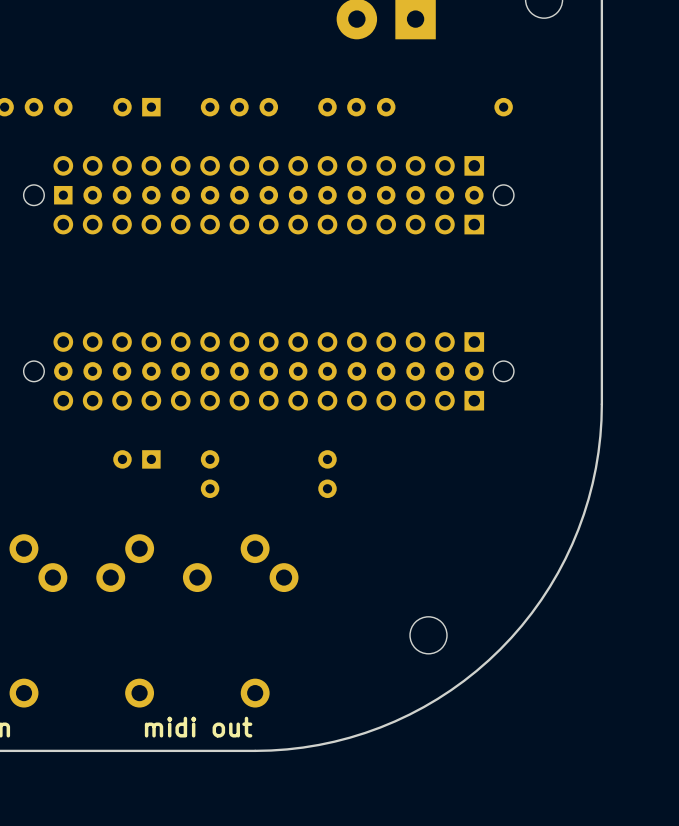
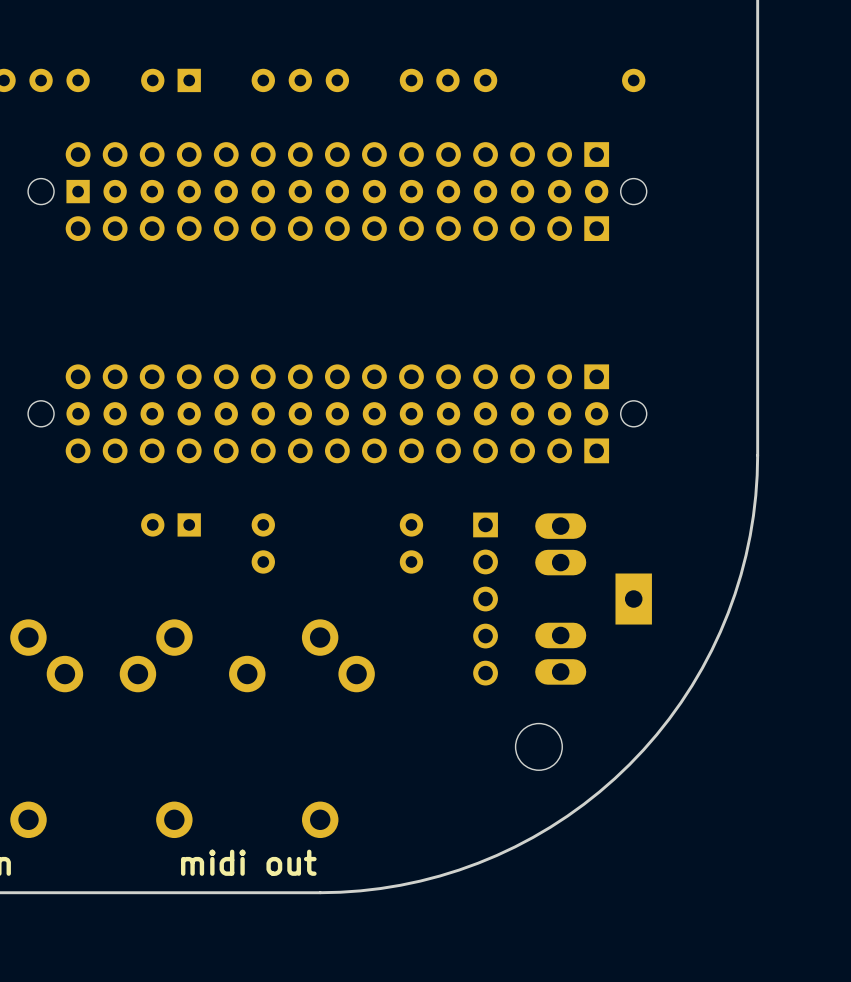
part: none -> (485, 599)
part: none -> (593, 599)

